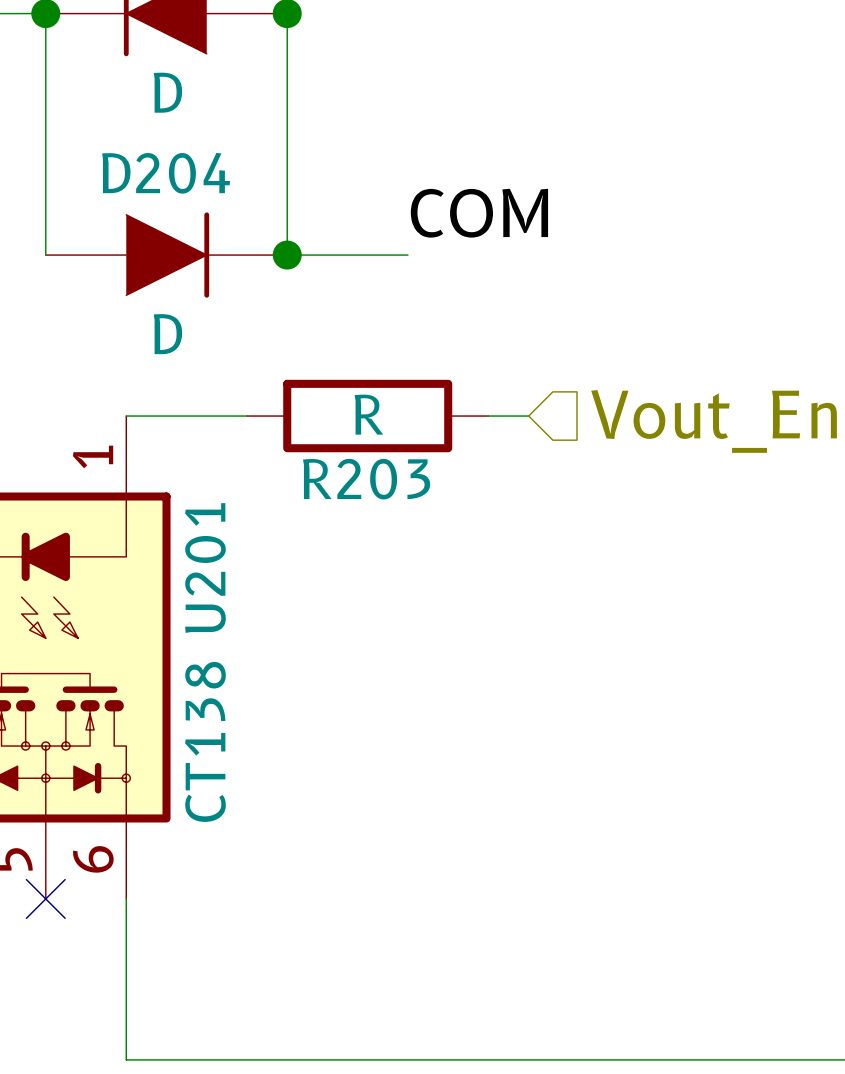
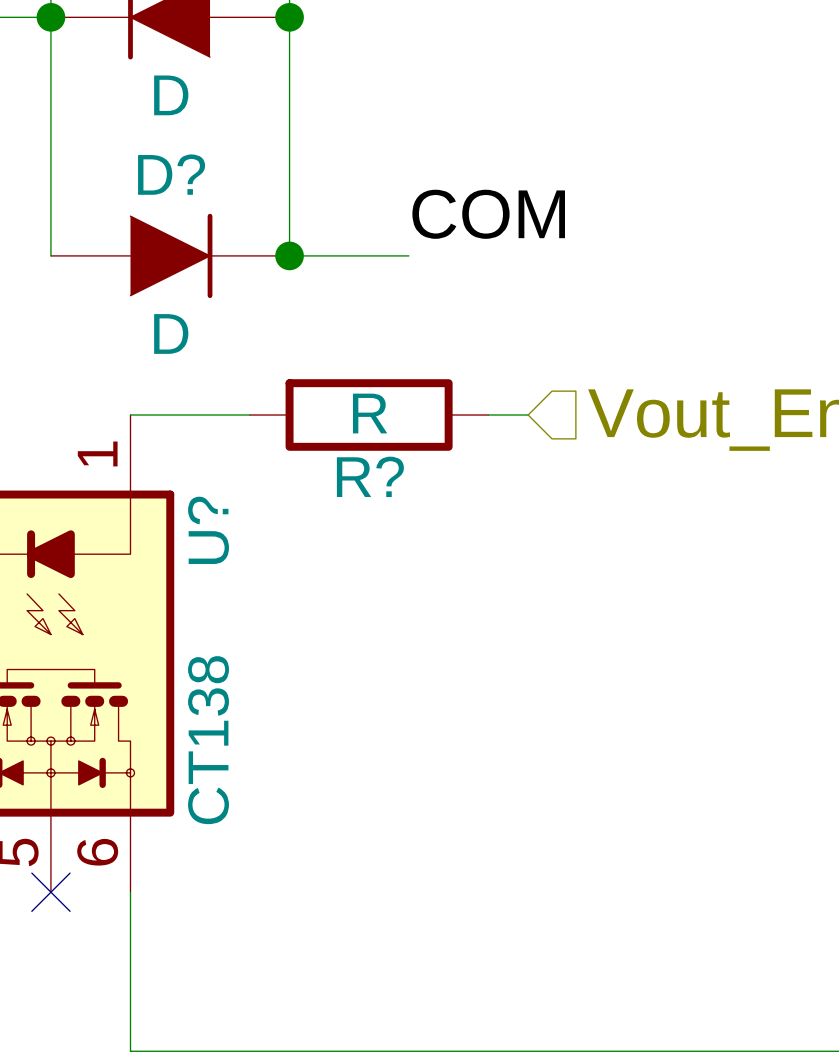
D204 name: D204 (166, 173) -> D? (171, 174)
R203 name: R203 (366, 479) -> R? (370, 476)
U201 name: U201 (205, 568) -> U? (208, 530)

